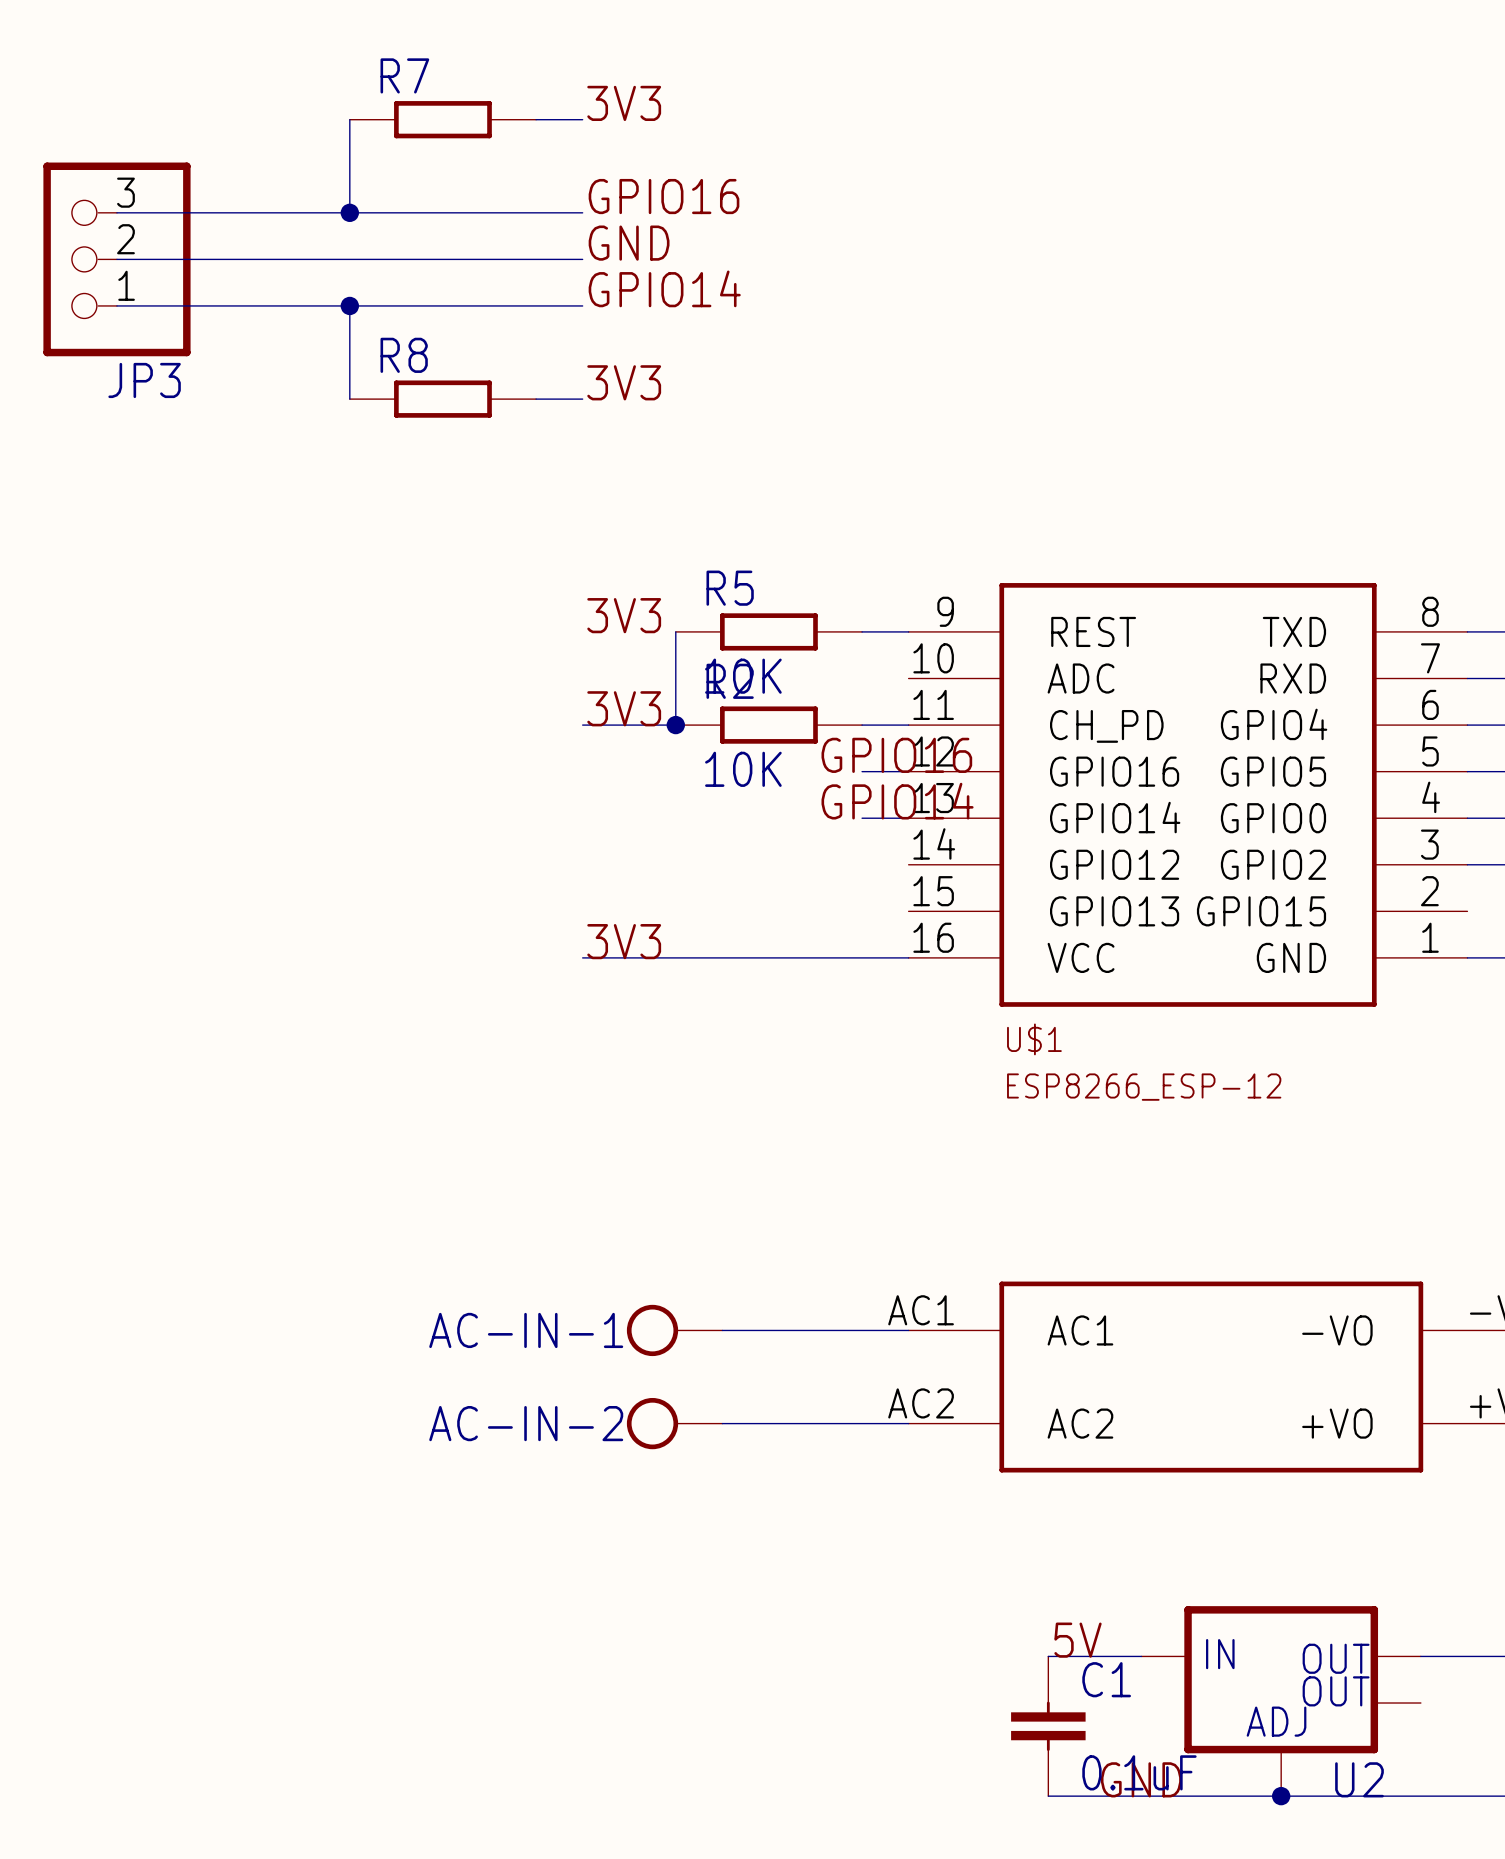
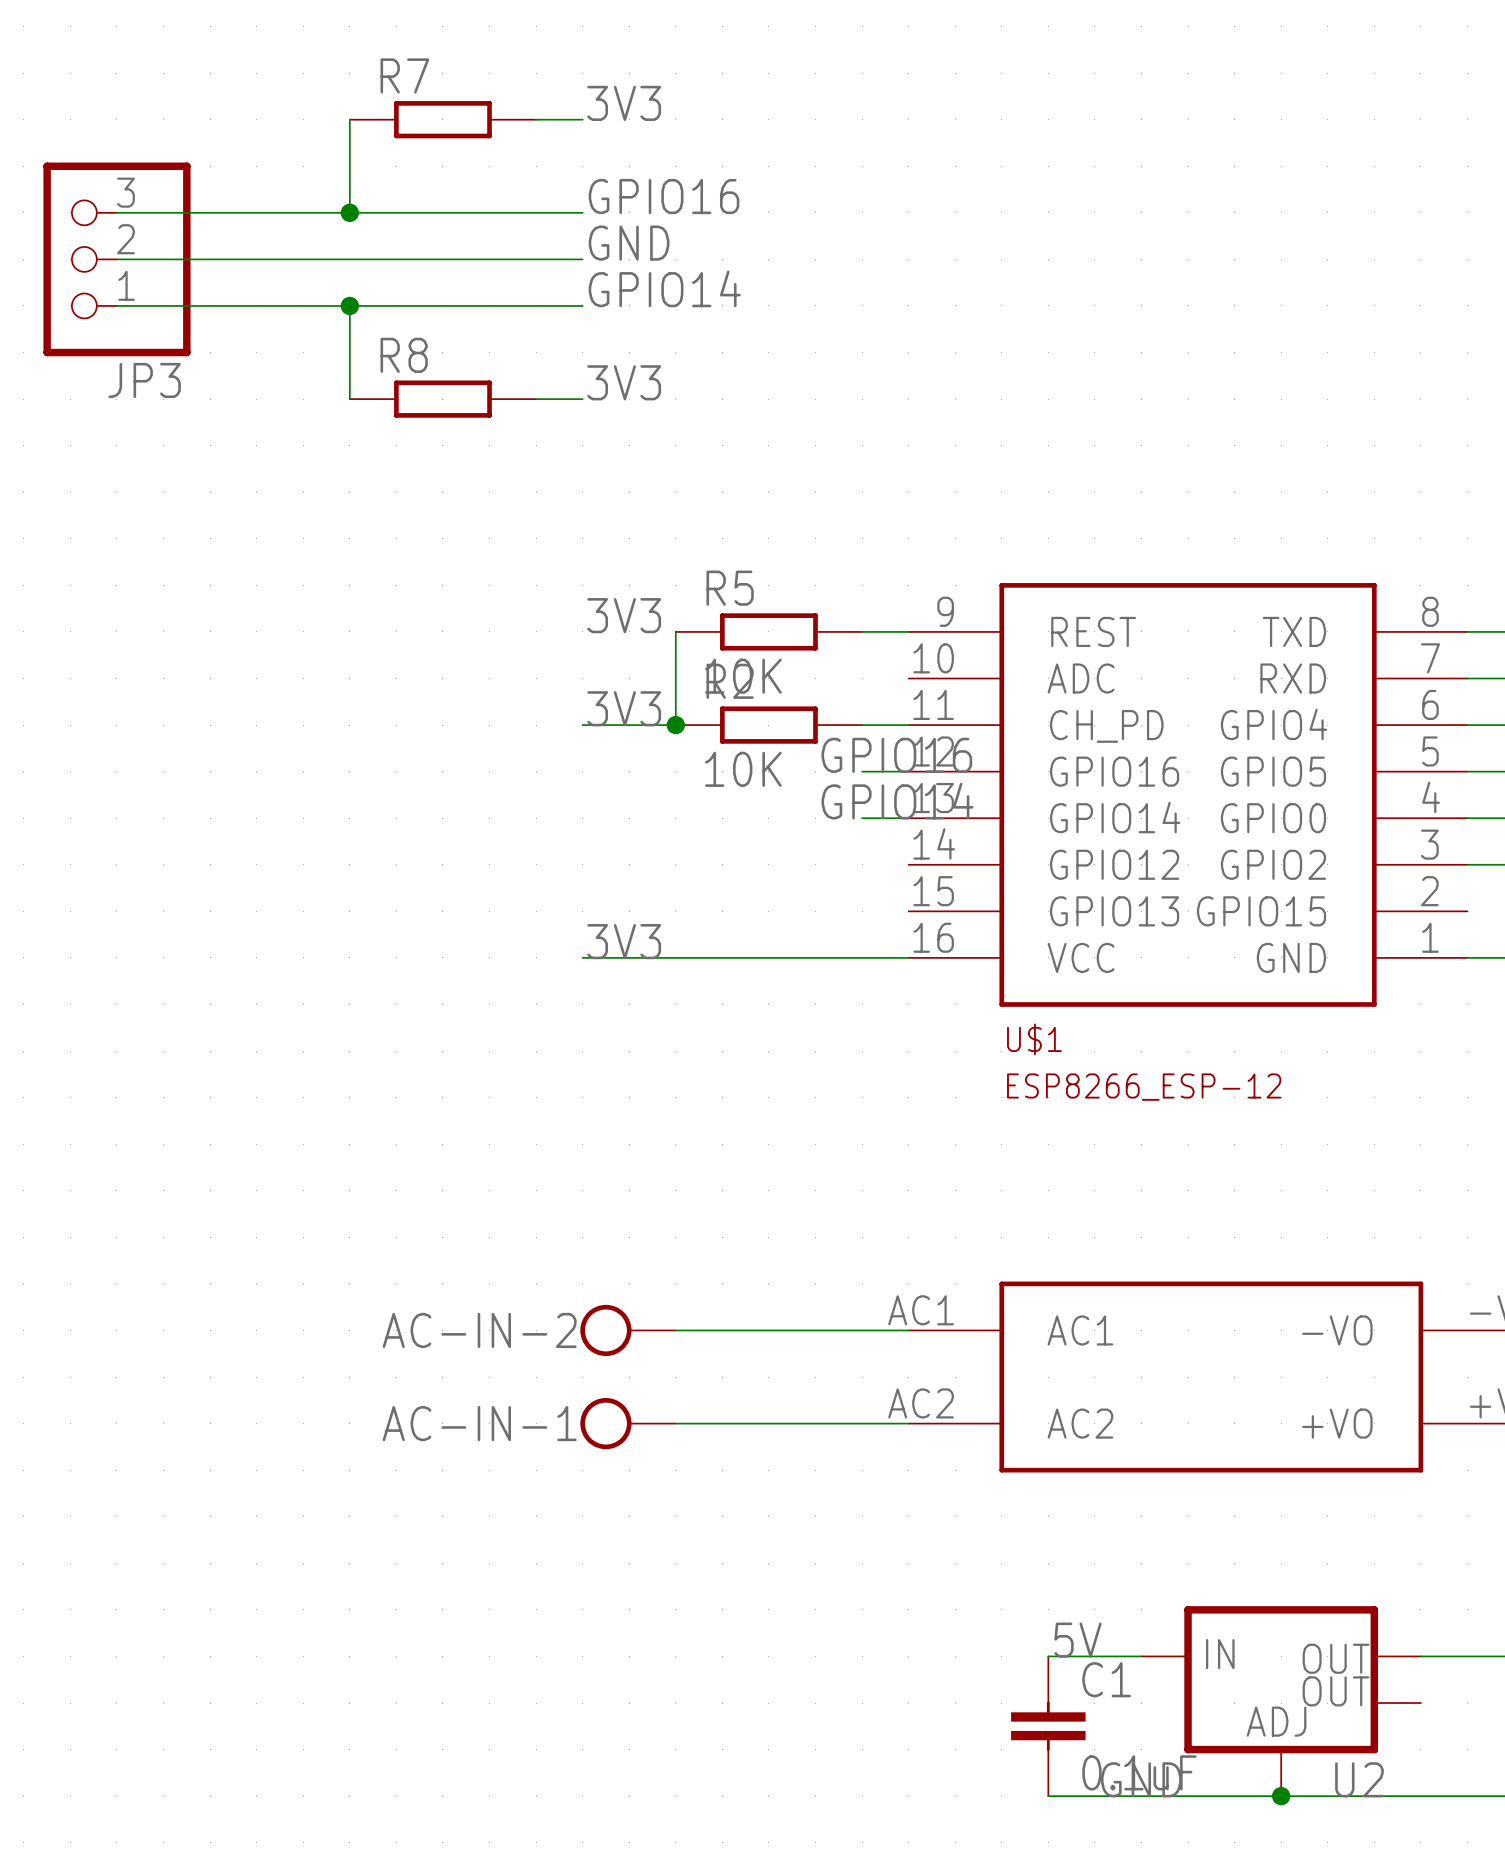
AC-IN-1 position: (674, 1330) -> (628, 1423)
AC-IN-2 position: (674, 1423) -> (628, 1330)

